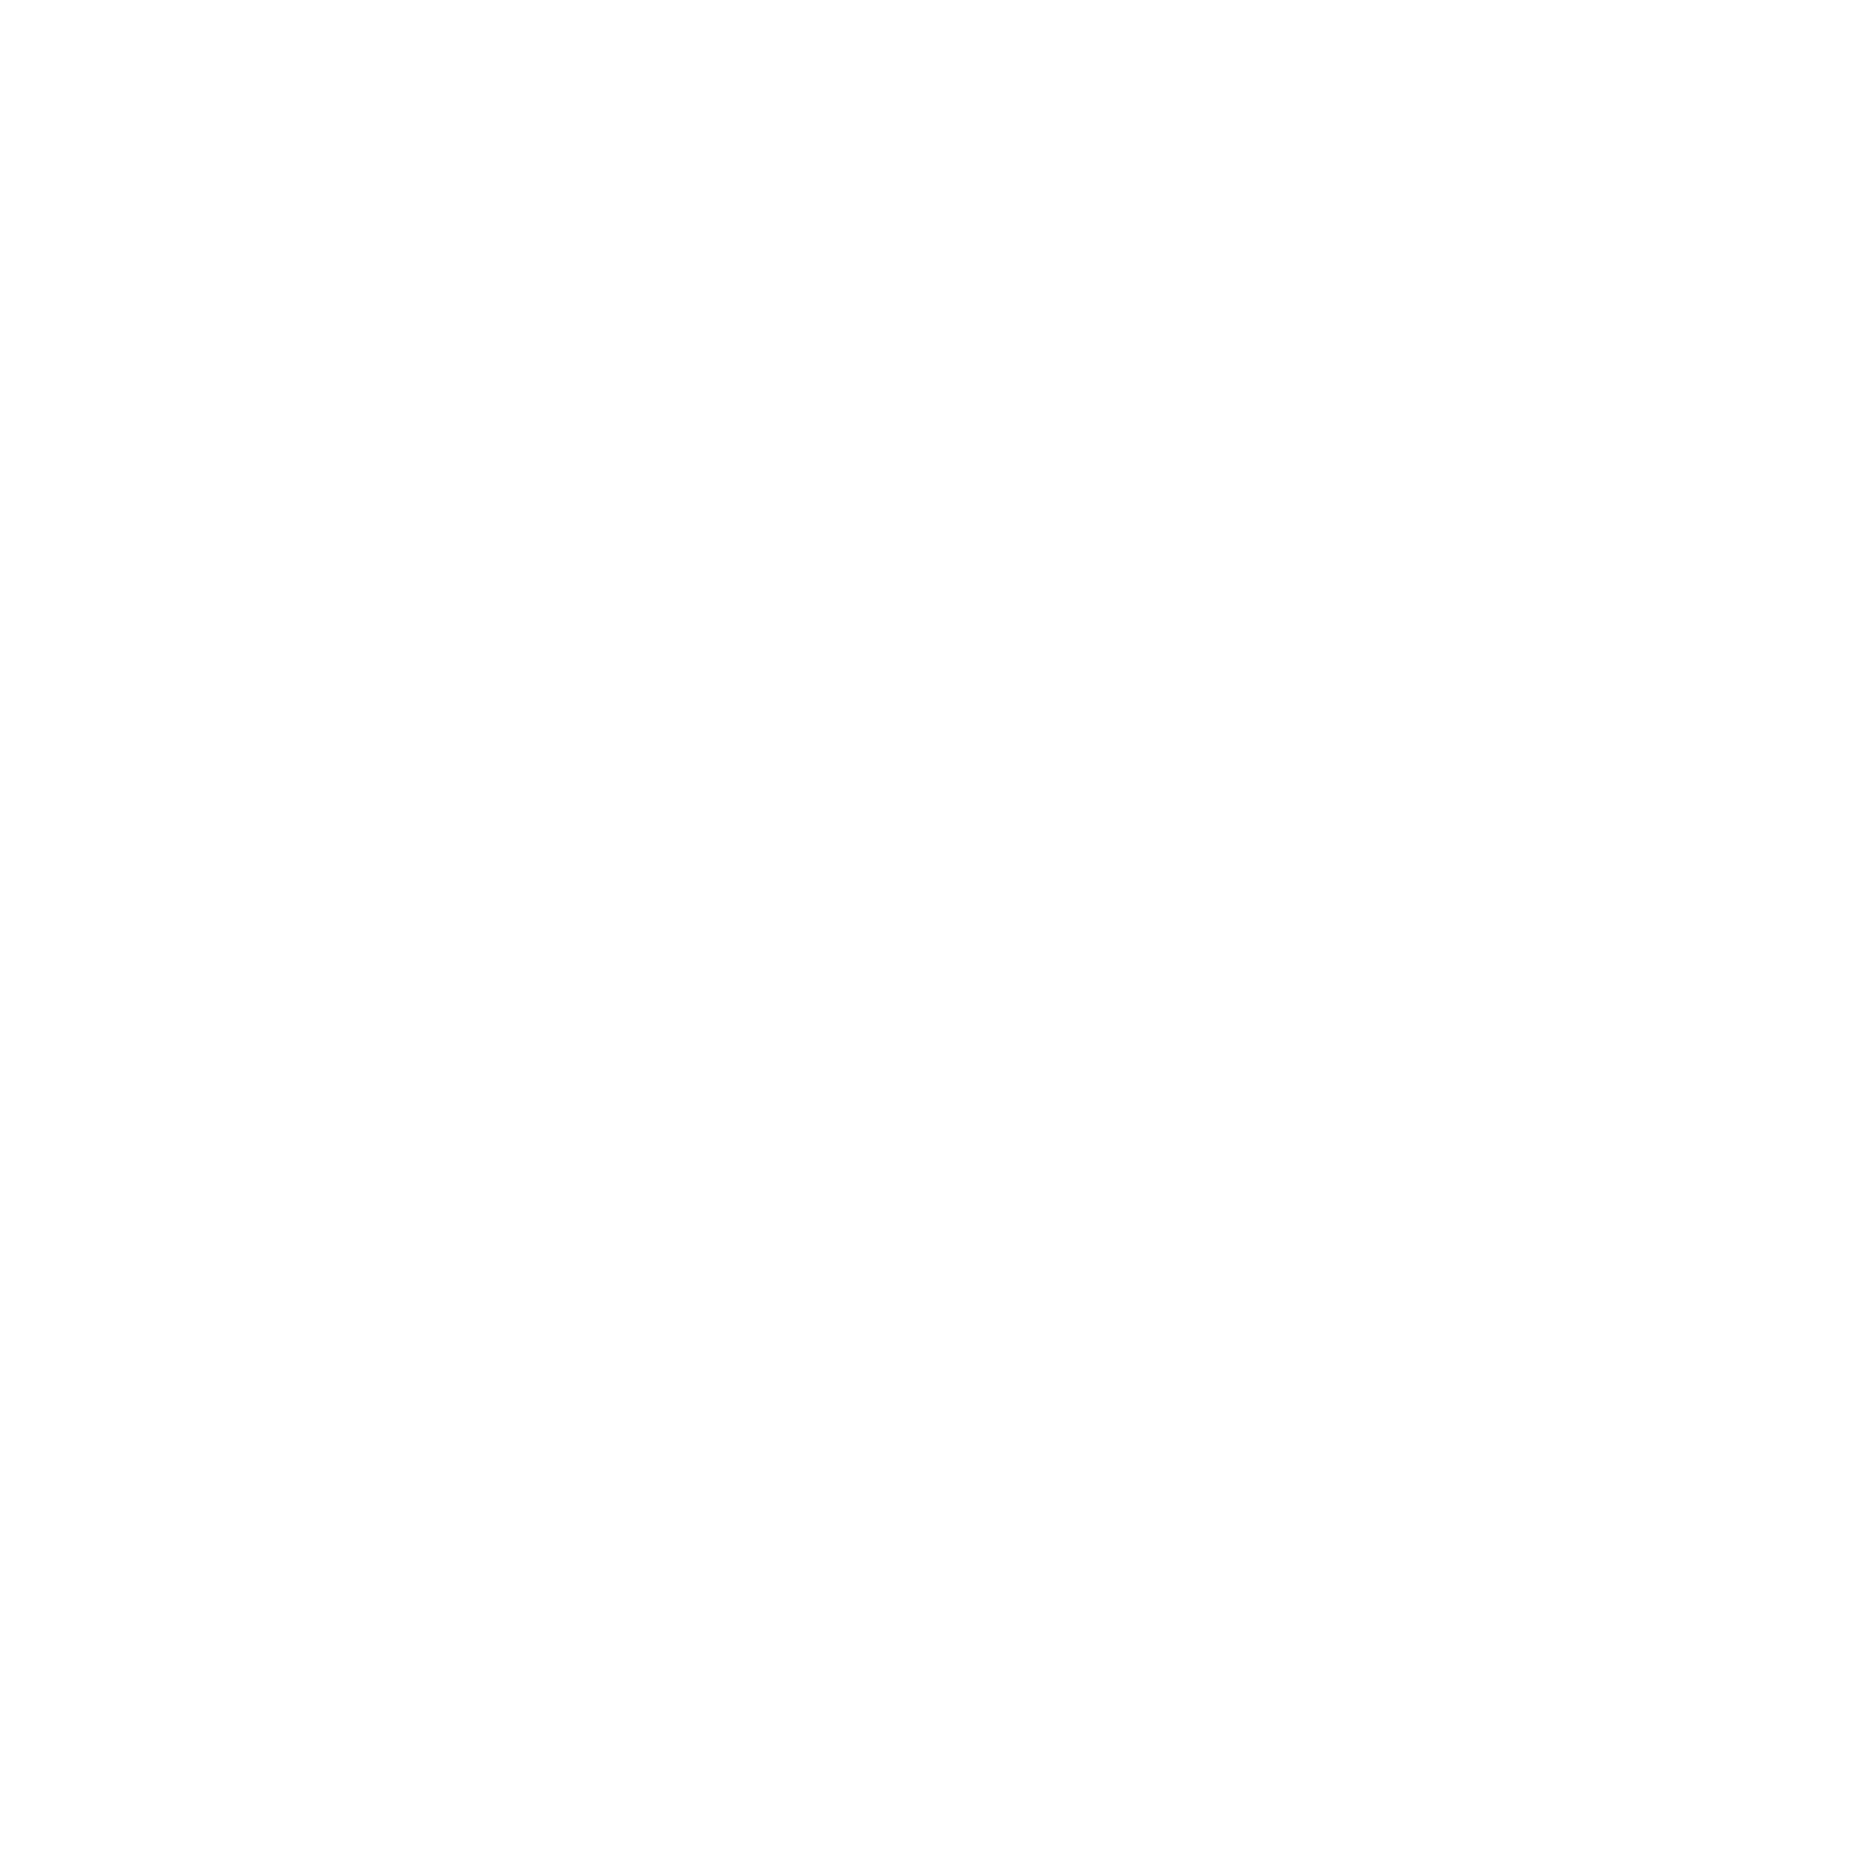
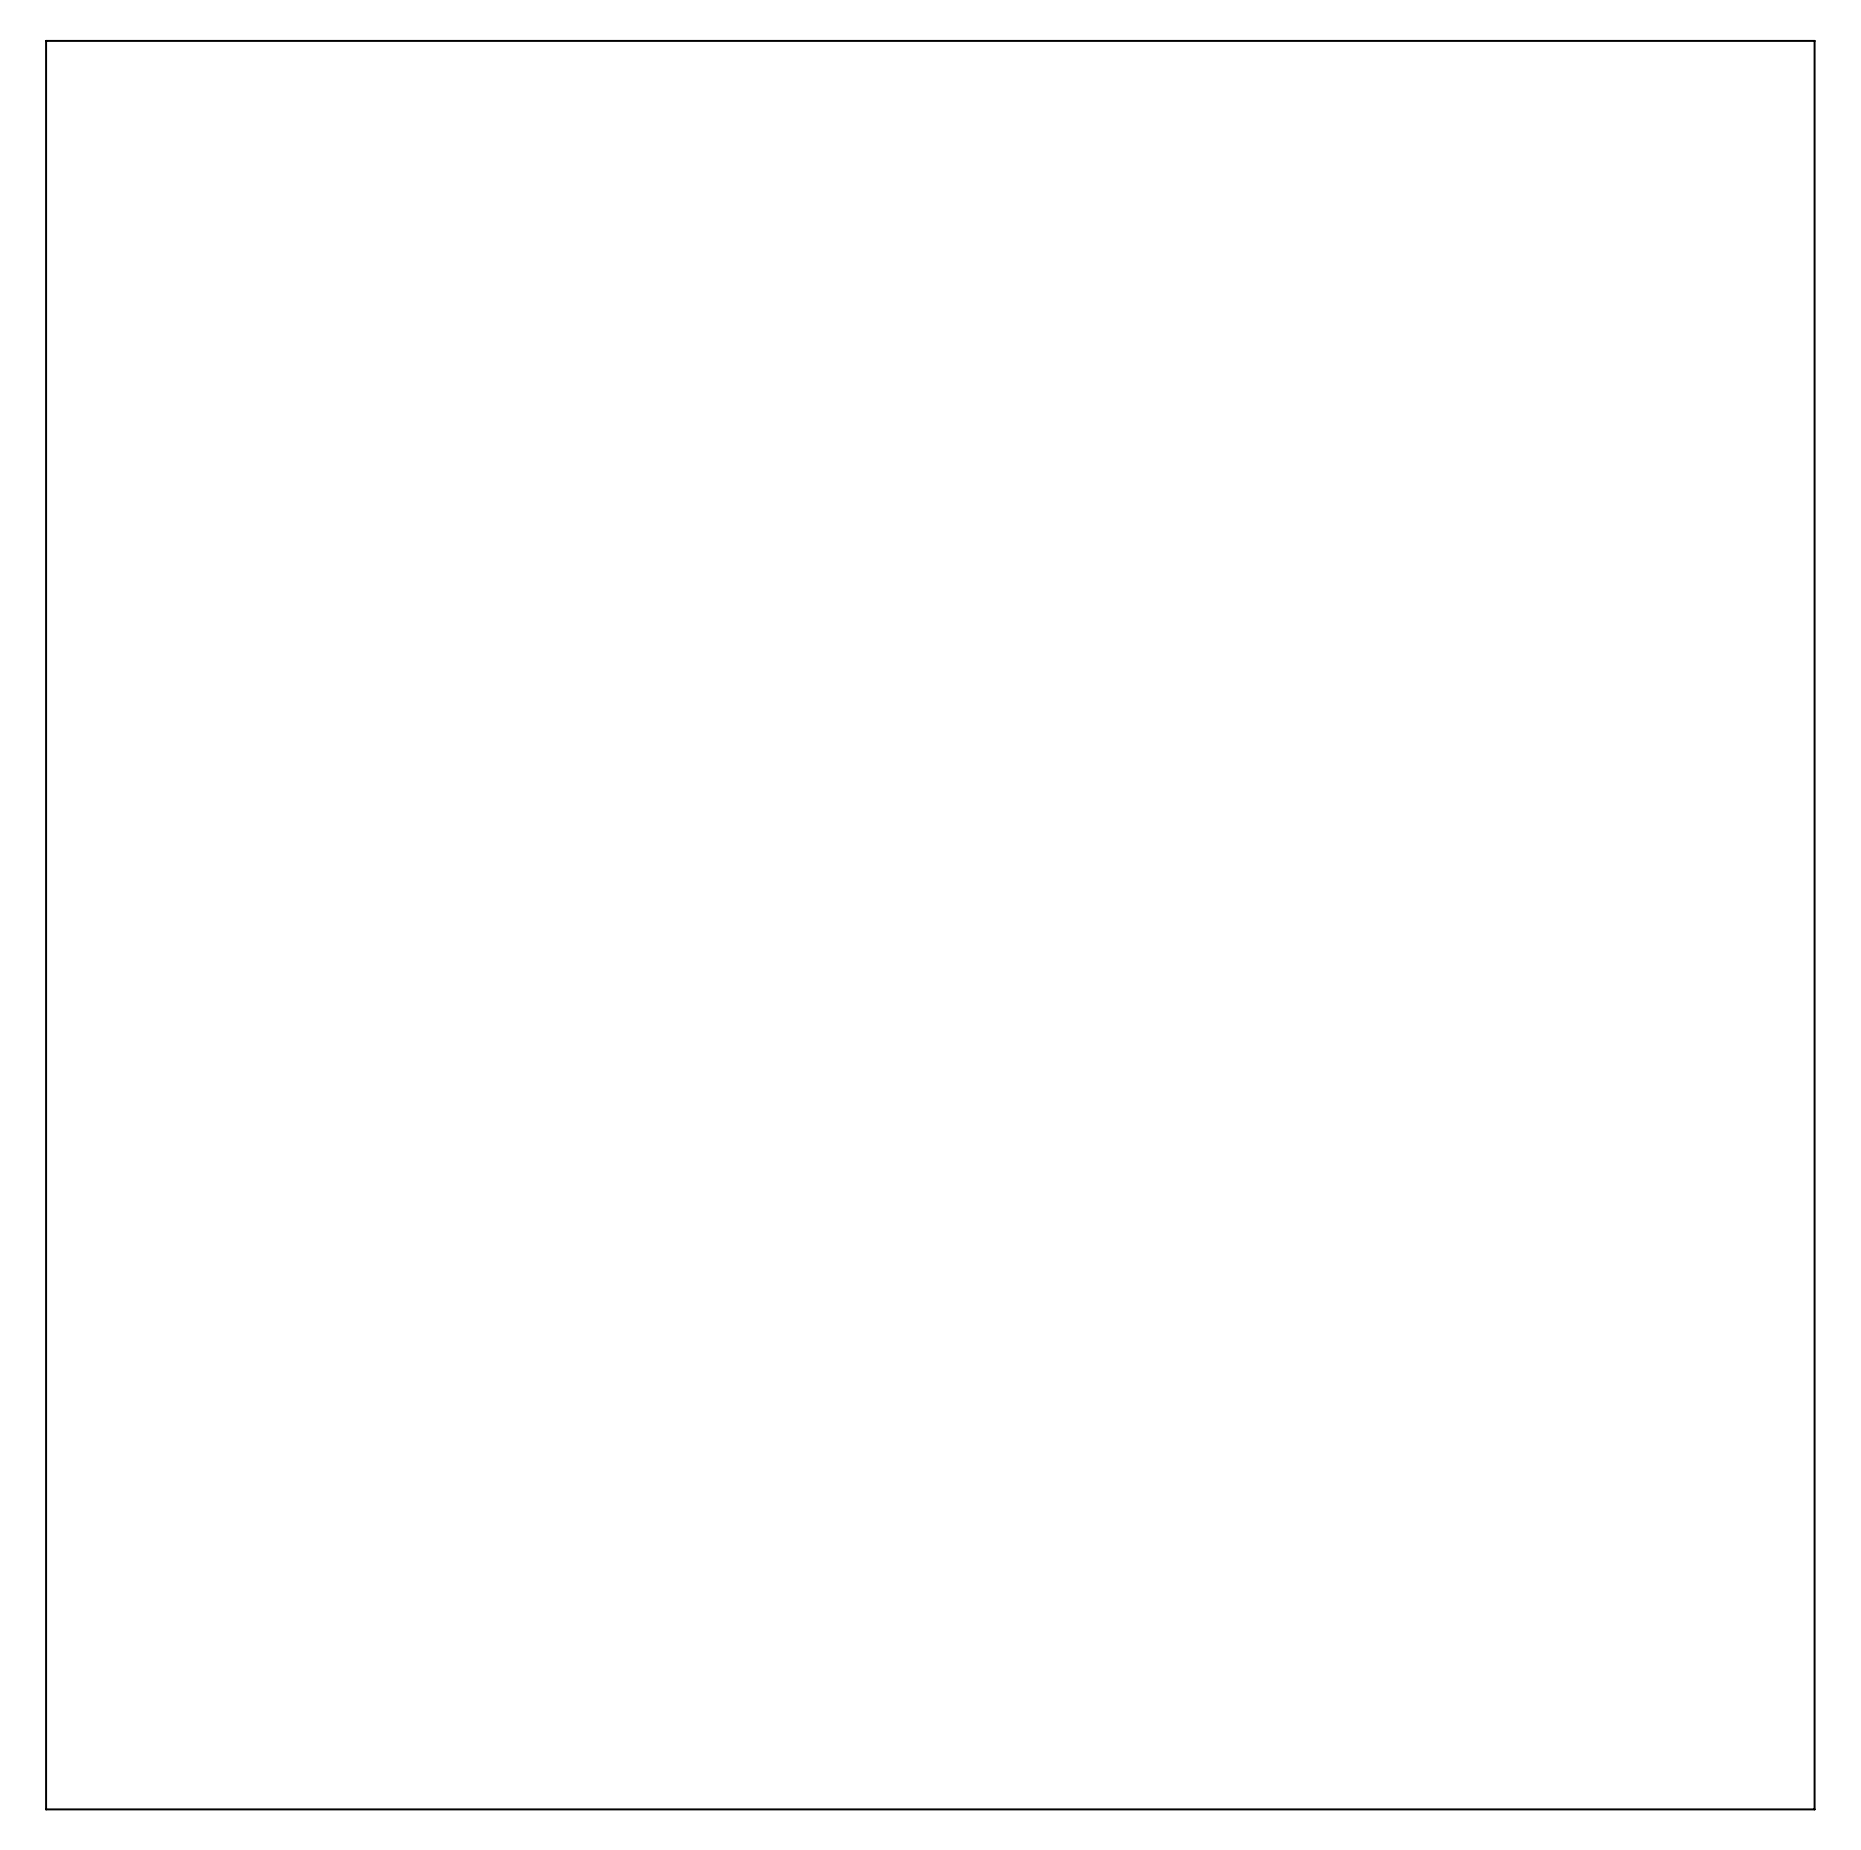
board edge: none -> (46, 40) (1814, 40) (1814, 1809) (46, 1809) (46, 40)

